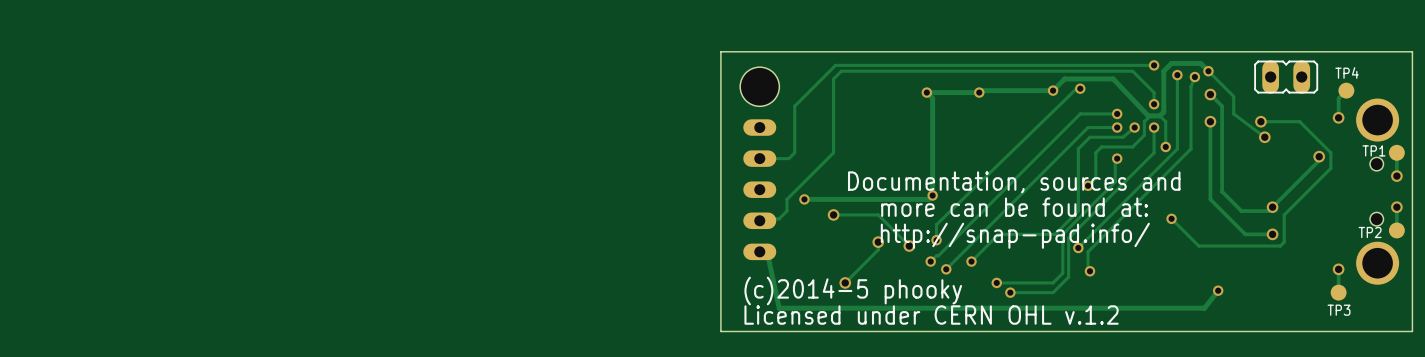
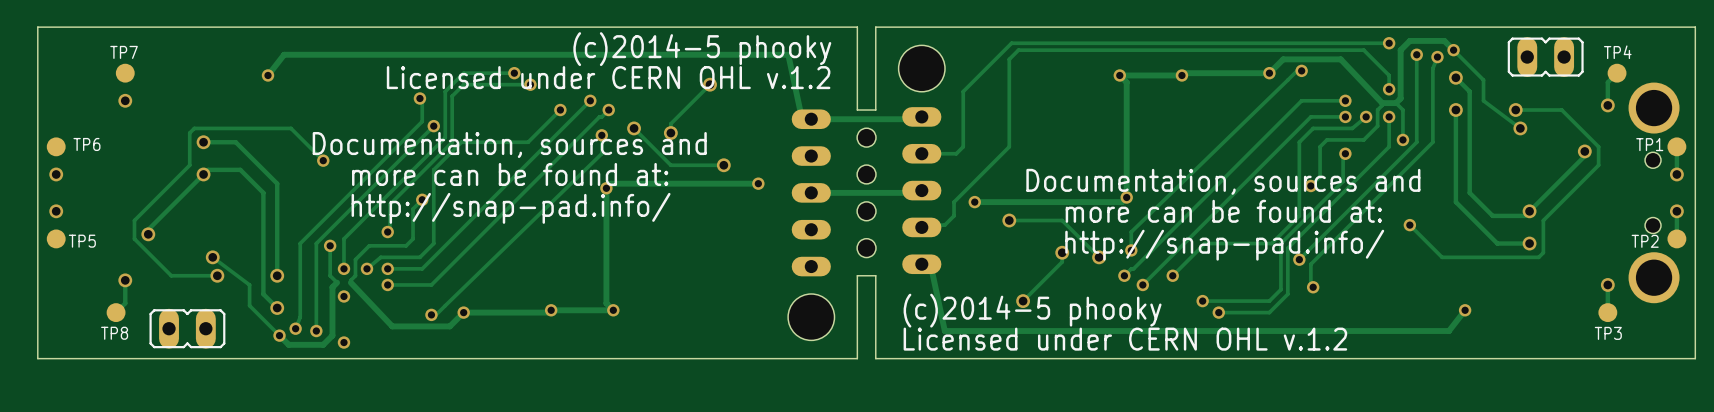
text: none -> (c)2014-5 phooky (702, 49)
TP7: none -> (125, 73)
track: none -> (514, 73) (463, 73) (445, 91) (445, 137) (343, 238) (343, 268)
via: none -> (514, 73)
track: none -> (268, 75) (284, 54) (788, 54) (802, 119) (921, 119)
via: none -> (268, 75)
text: none -> Licensed under CERN OHL v.1.2 (608, 77)
track: none -> (530, 84) (463, 84) (452, 96) (452, 142) (390, 204) (390, 229) (387, 232)
via: none -> (530, 84)
track: none -> (710, 84) (670, 123) (670, 133)
via: none -> (710, 84)
track: none -> (419, 98) (422, 100) (422, 121) (300, 243) (300, 317) (295, 328)
via: none -> (419, 98)
via: none -> (125, 100)
track: none -> (590, 100) (422, 268) (387, 268)
via: none -> (590, 100)
track: none -> (560, 110) (528, 142) (461, 142) (433, 169) (433, 243) (419, 257) (380, 257) (367, 268)
via: none -> (560, 110)
track: none -> (608, 110) (599, 116) (431, 284) (387, 284)
via: none -> (608, 110)
board edge: (720, 121) (720, 261) -> (875, 110) (857, 110) (857, 27) (37, 27) (37, 358) (857, 358) (857, 275) (875, 275)
track: none -> (433, 126) (316, 243) (316, 331)
via: none -> (433, 126)
track: none -> (634, 128) (670, 165) (723, 165)
via: none -> (634, 128)
via: none -> (670, 133)
track: none -> (601, 135) (601, 153) (436, 314) (431, 314)
via: none -> (601, 135)
hole: none -> (866, 137)
track: none -> (203, 142) (235, 142) (277, 183) (277, 275)
via: none -> (203, 142)
text: none -> Documentation, sources and (509, 145)
TP6: none -> (56, 146)
track: none -> (323, 160) (291, 128) (194, 128) (189, 133) (189, 165) (134, 220) (134, 238) (171, 275) (217, 275)
via: none -> (323, 160)
via: none -> (723, 165)
via: none -> (56, 174)
via: none -> (203, 174)
text: none -> more can be found at: (510, 174)
hole: none -> (866, 174)
track: none -> (758, 183) (611, 183) (606, 188) (606, 303) (613, 310) (463, 312) (449, 326) (392, 326) (350, 282) (355, 275) (355, 259) (369, 245) (406, 245) (413, 238) (413, 209) (422, 199)
via: none -> (758, 183)
via: none -> (606, 188)
part: none -> (811, 192)
track: none -> (921, 192) (811, 192)
via: none -> (422, 199)
text: none -> http://snap-pad.info/ (511, 208)
via: none -> (56, 211)
hole: none -> (866, 211)
via: none -> (387, 232)
track: none -> (148, 234) (148, 229) (208, 169) (240, 169) (263, 192) (263, 294) (277, 307)
via: none -> (148, 234)
TP5: none -> (56, 238)
track: none -> (330, 245) (330, 275) (337, 282) (332, 287) (332, 335) (323, 344) (288, 344) (249, 305) (249, 284) (212, 257)
via: none -> (330, 245)
hole: none -> (866, 248)
via: none -> (212, 257)
via: none -> (343, 268)
via: none -> (367, 268)
via: none -> (387, 268)
via: none -> (217, 275)
via: none -> (277, 275)
track: none -> (125, 280) (125, 303) (116, 312)
via: none -> (125, 280)
via: none -> (387, 284)
via: none -> (343, 296)
via: none -> (277, 307)
via: none -> (551, 310)
via: none -> (613, 310)
TP8: none -> (116, 312)
via: none -> (463, 312)
via: none -> (431, 314)
hole: none -> (811, 317)
part: none -> (187, 328)
via: none -> (295, 328)
via: none -> (316, 331)
via: none -> (279, 335)
via: none -> (343, 342)

